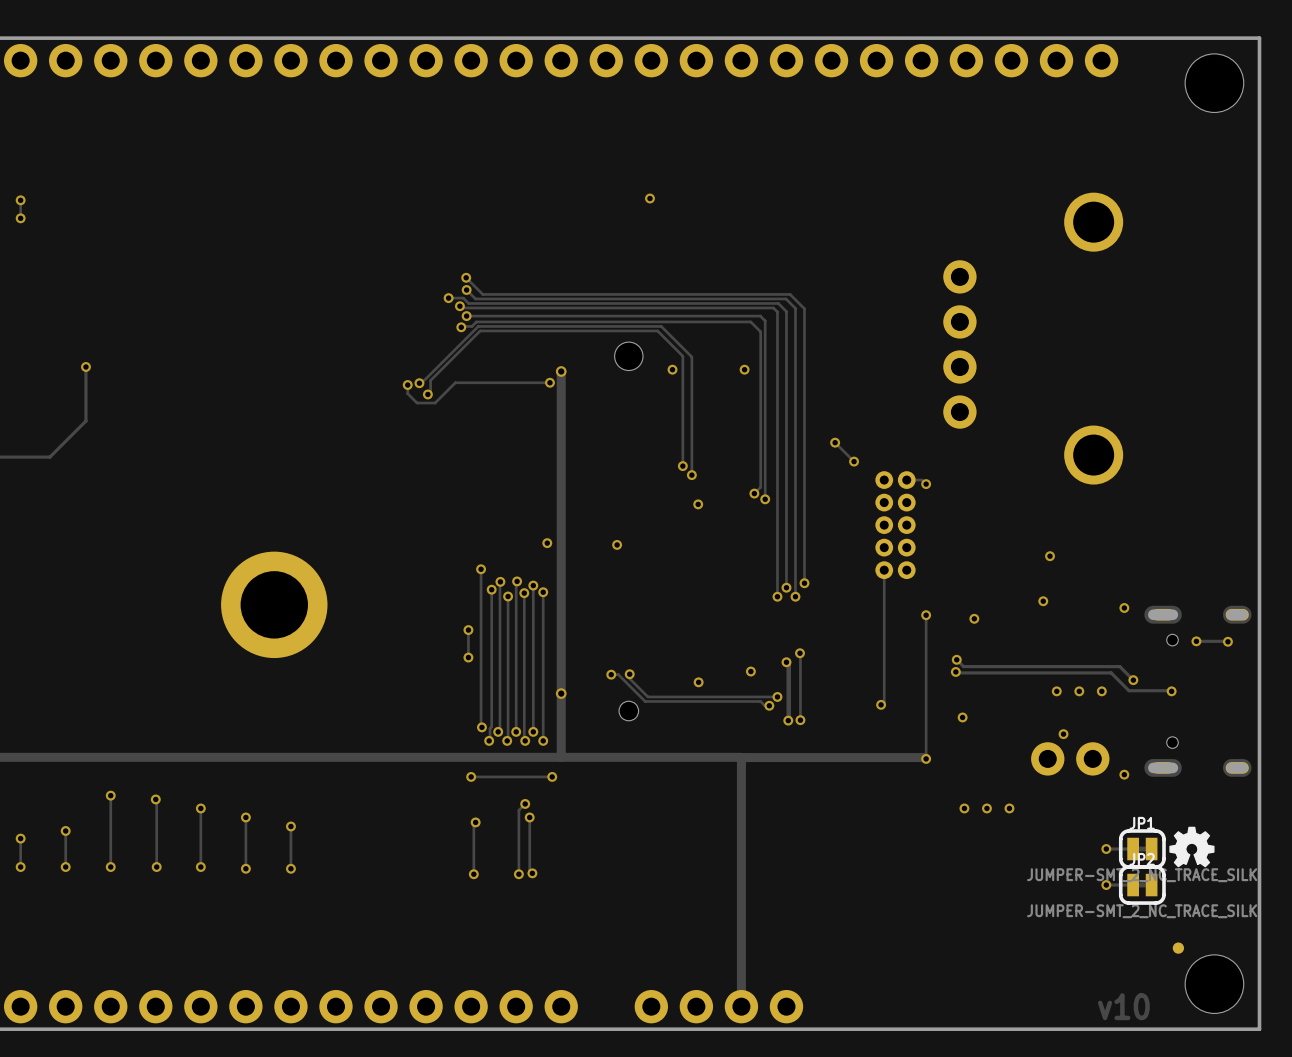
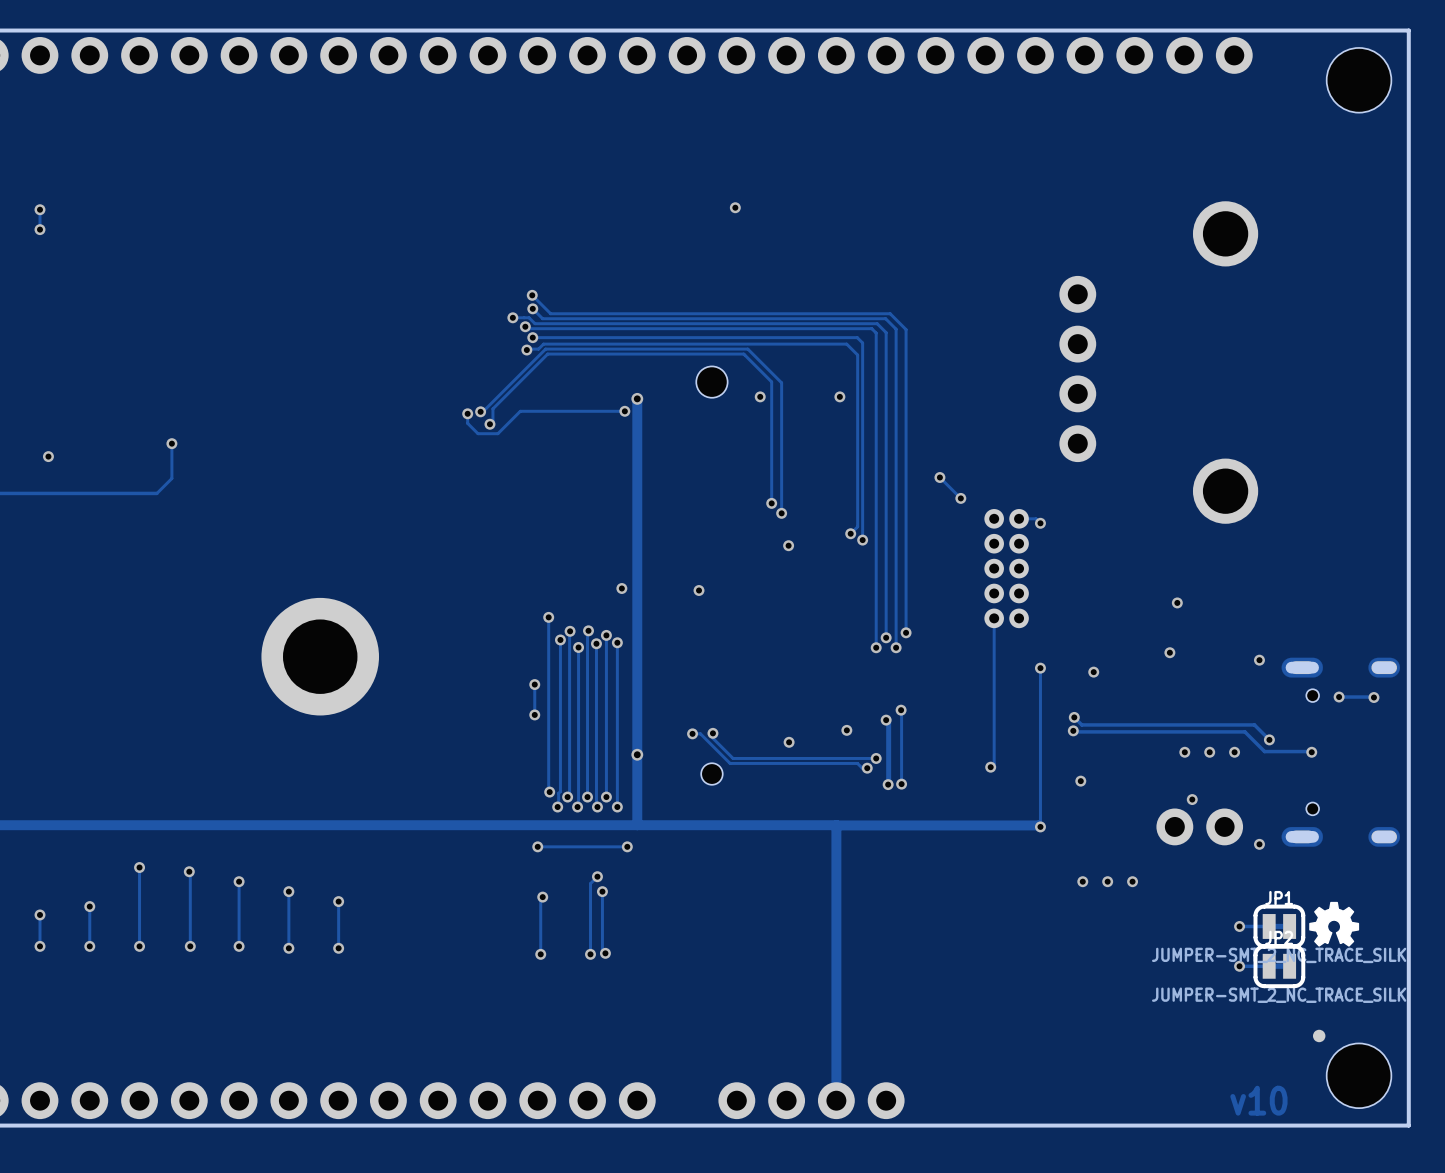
track: (85, 366) (85, 421) (49, 457) -> (171, 443) (171, 478) (156, 493) (72, 493)
via: (85, 366) -> none
via: none -> (171, 443)
via: none -> (48, 456)

